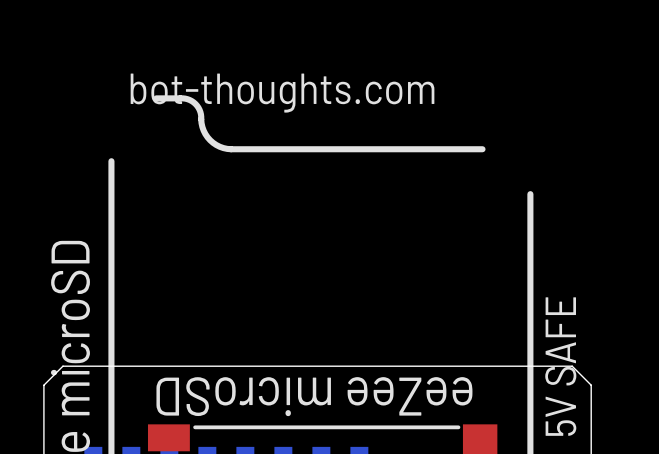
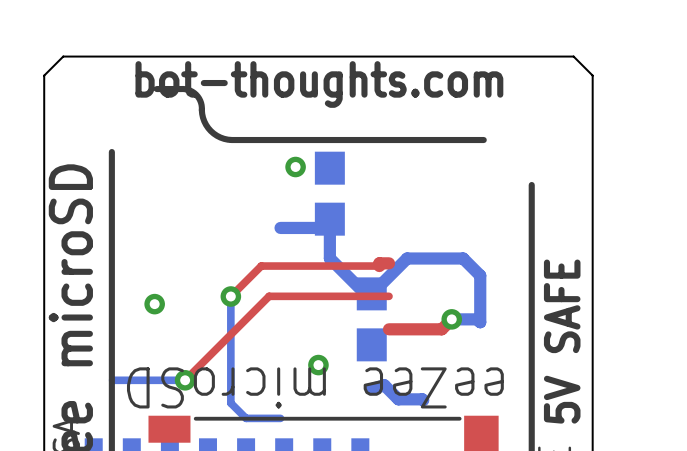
via: none -> (295, 167)
part: none -> (329, 193)
bottom track: none -> (280, 227) (321, 227) (329, 219) (329, 258) (365, 293) (371, 293) (407, 258) (463, 258) (480, 275) (480, 322) (477, 319) (451, 319)
top track: none -> (389, 263) (379, 263) (379, 266) (261, 266) (230, 296)
bottom track: none -> (230, 296) (230, 403) (246, 418) (280, 418)
via: none -> (230, 296)
top track: none -> (389, 296) (269, 296) (185, 380)
via: none -> (154, 304)
part: none -> (371, 319)
top track: none -> (451, 319) (441, 329) (389, 329)
via: none -> (451, 319)
via: none -> (318, 365)
board edge: (43, 385) (62, 366) (572, 366) (591, 385) -> (44, 376) (44, 75) (63, 56) (573, 56) (592, 75) (592, 376)
bottom track: none -> (112, 380) (185, 380)
via: none -> (185, 380)
bottom track: none -> (371, 389) (384, 385) (398, 399) (423, 400)

